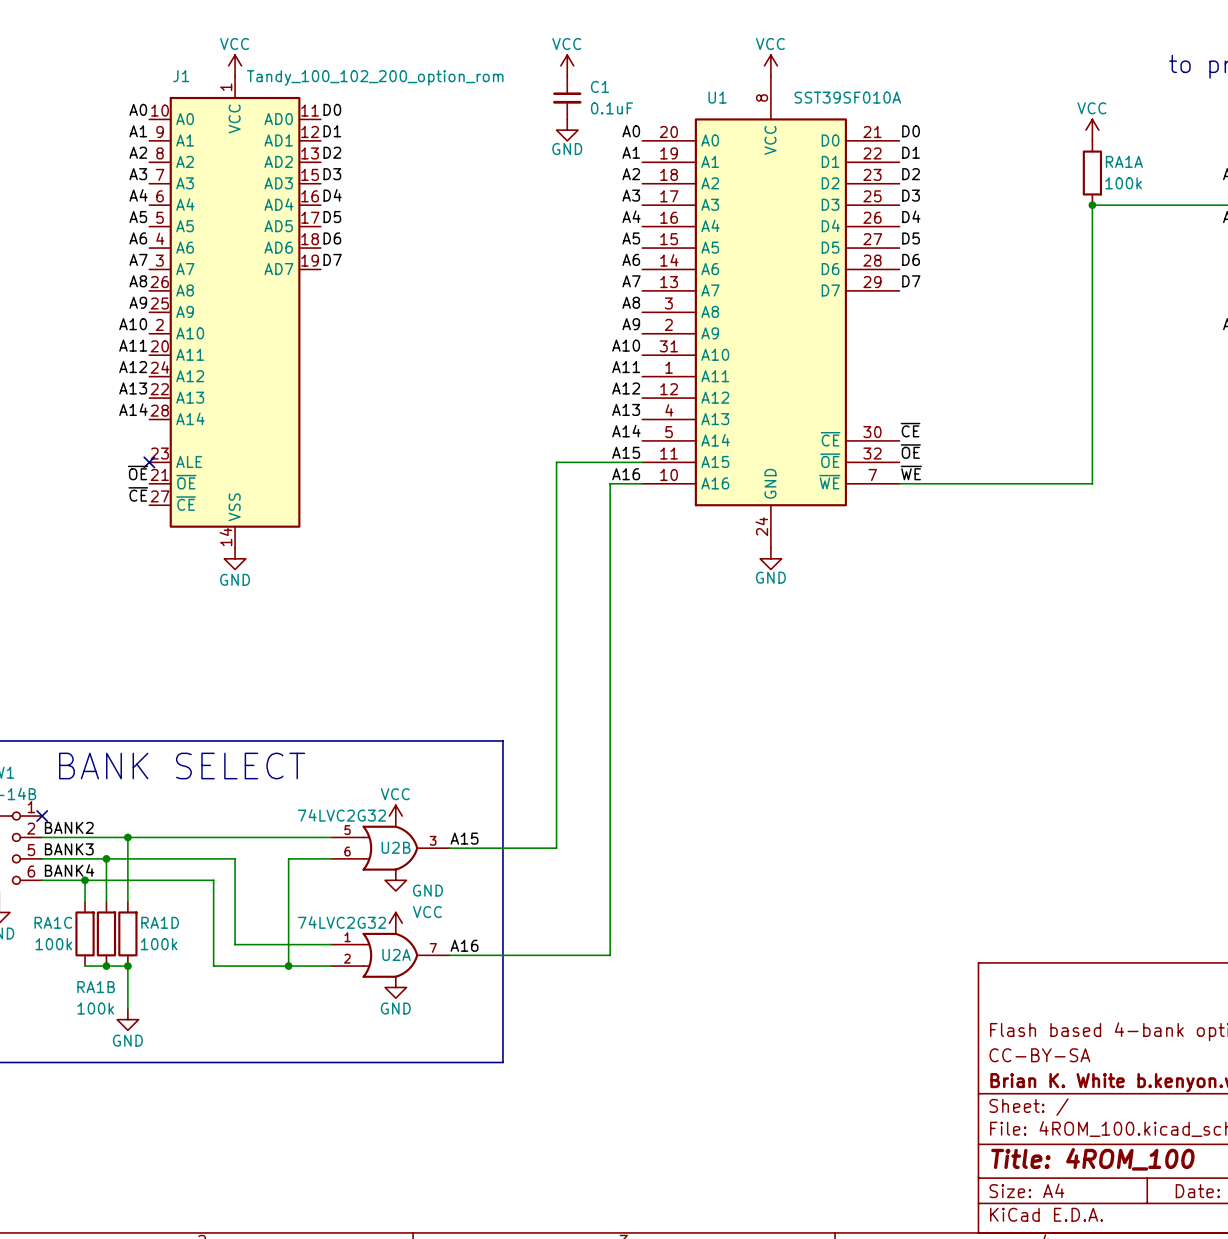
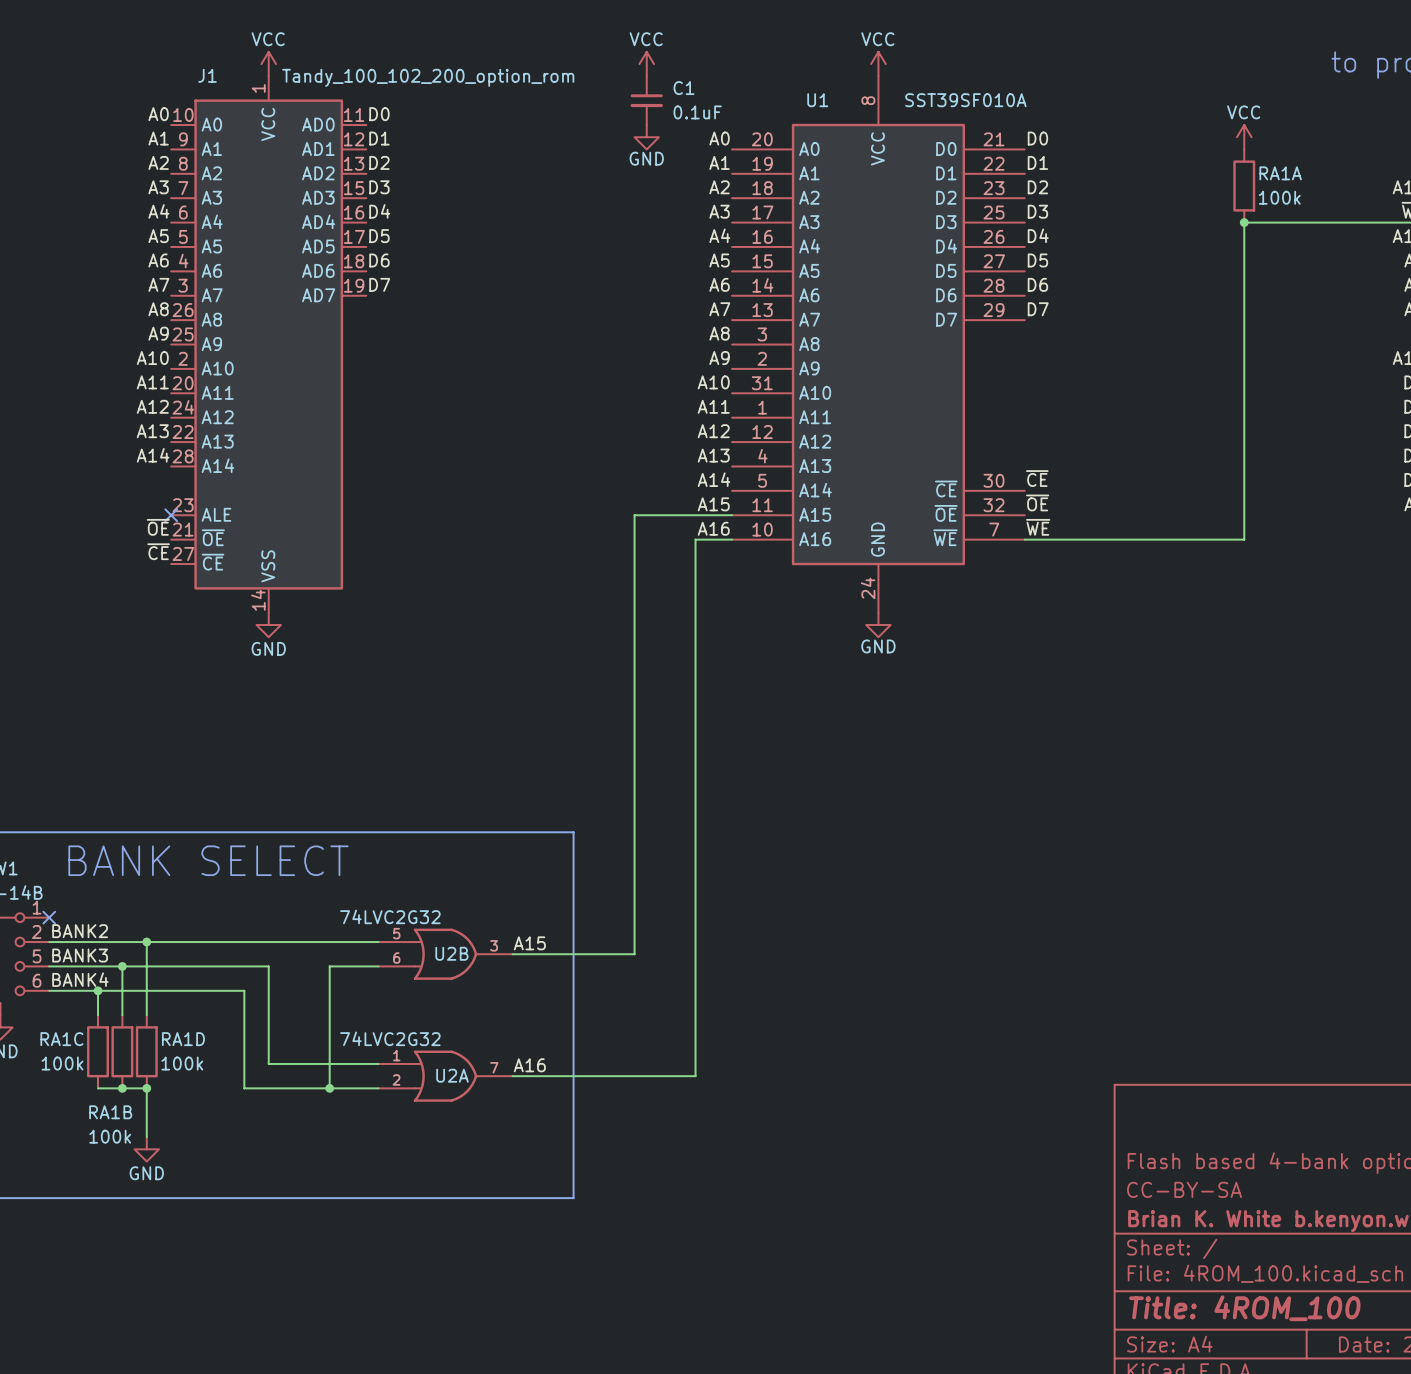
power symbol: VCC (395, 816) -> none
power symbol: GND (395, 880) -> none
power symbol: VCC (395, 923) -> none
power symbol: GND (395, 987) -> none

